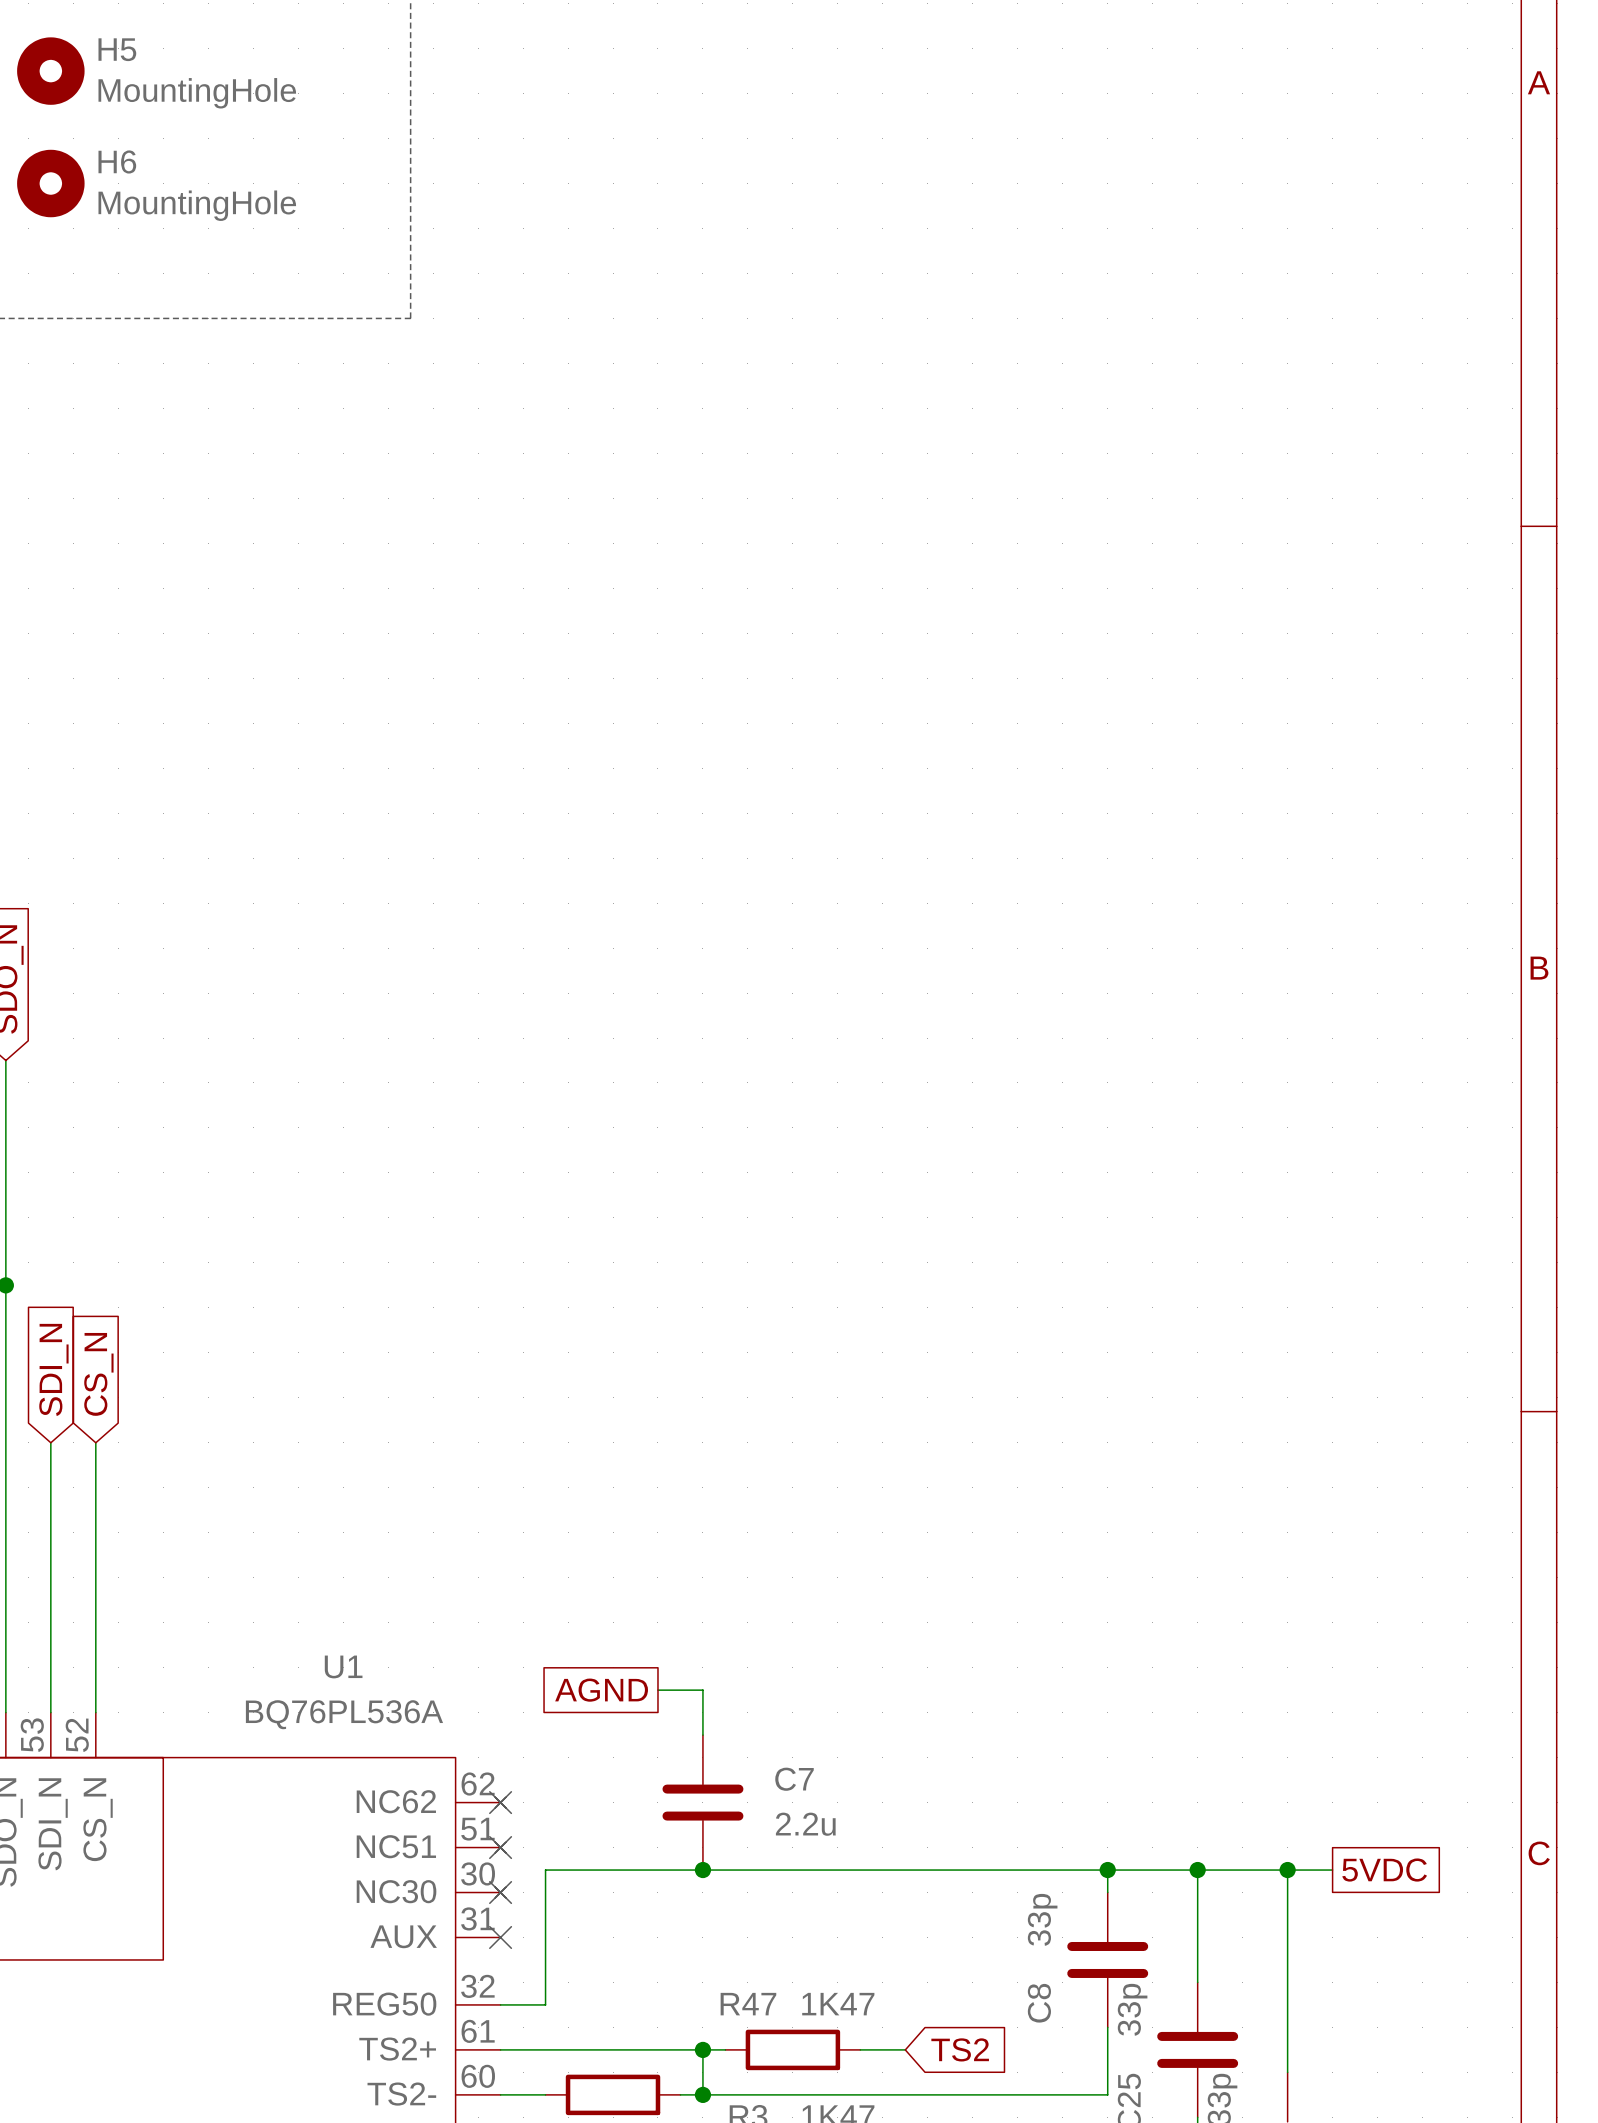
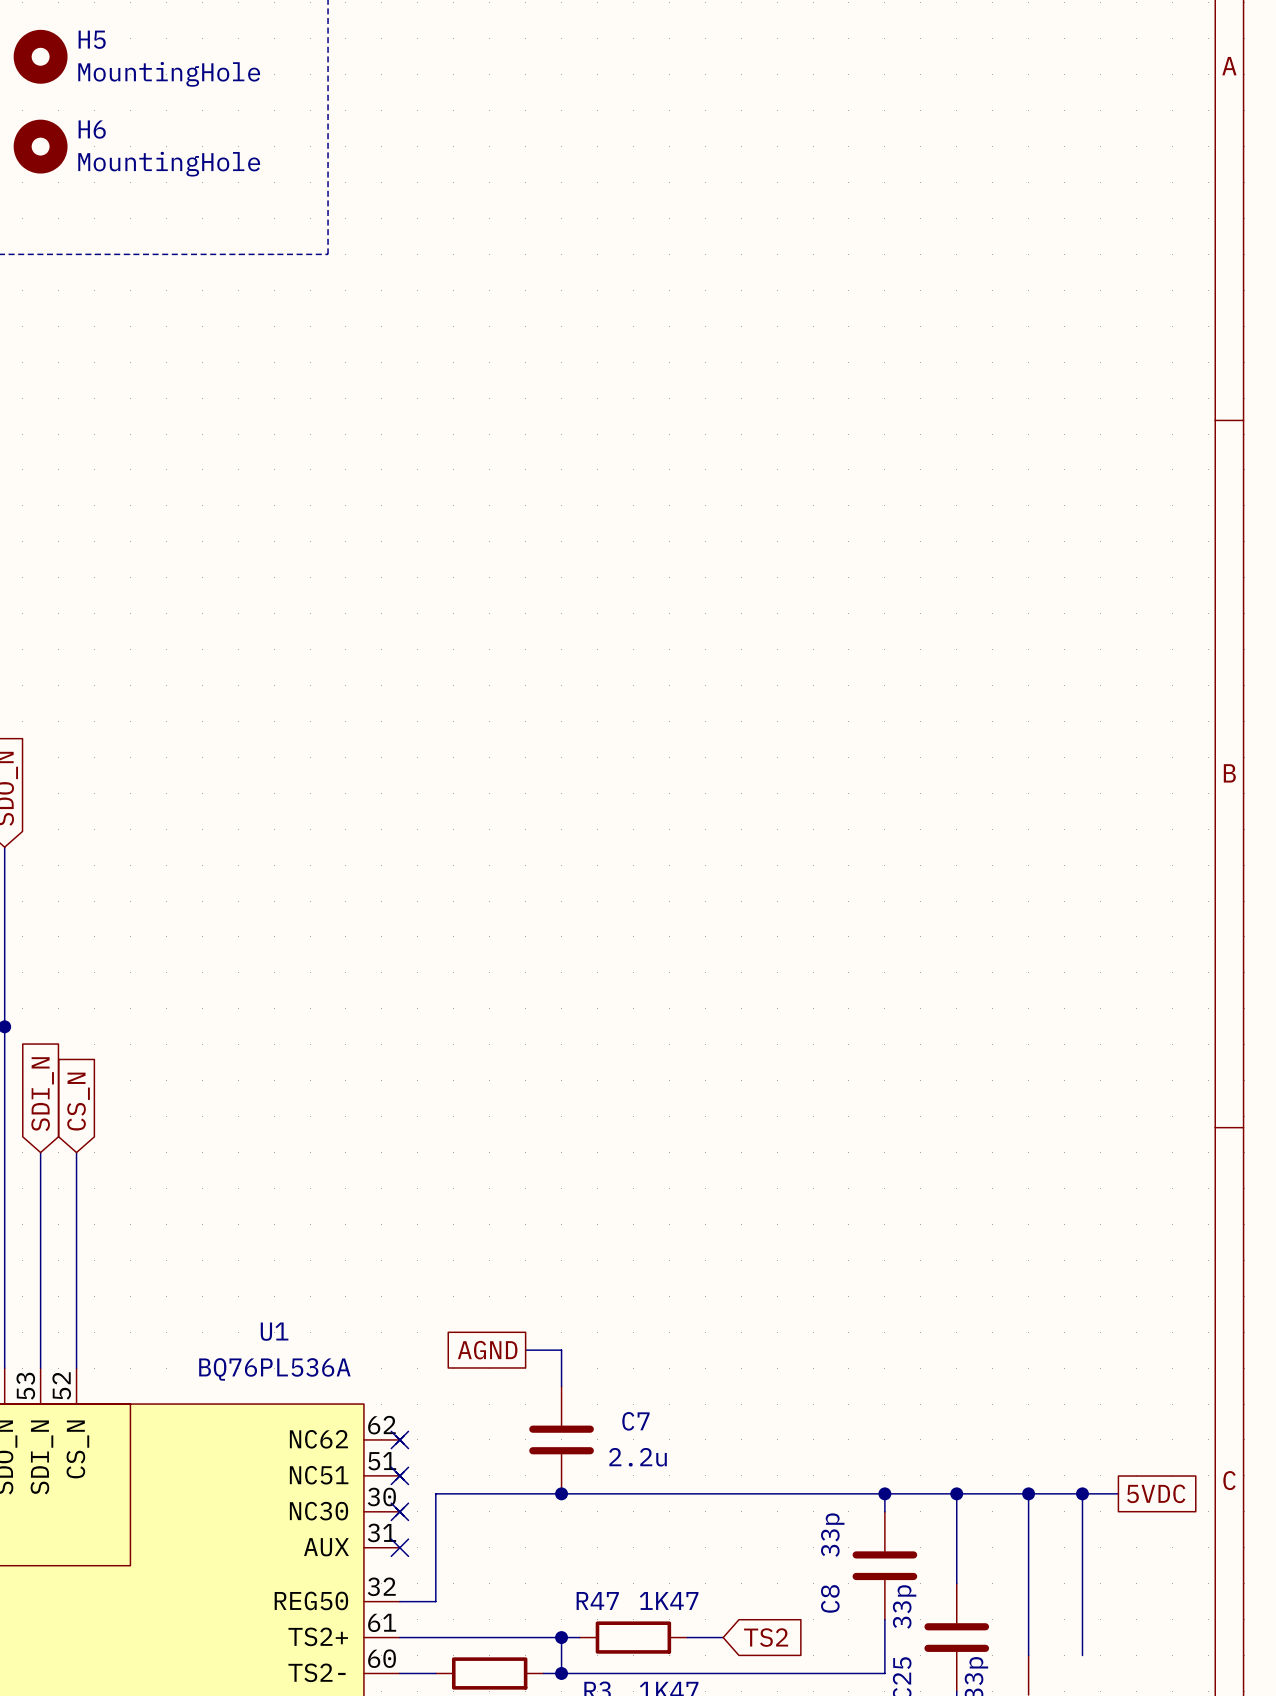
wire: none -> (1064, 1493) (1118, 1493)
wire: none -> (1082, 1493) (1082, 1655)
junction: none -> (1082, 1493)
global label position: 5VDC (1384, 1870) -> 5VDC (1156, 1493)

